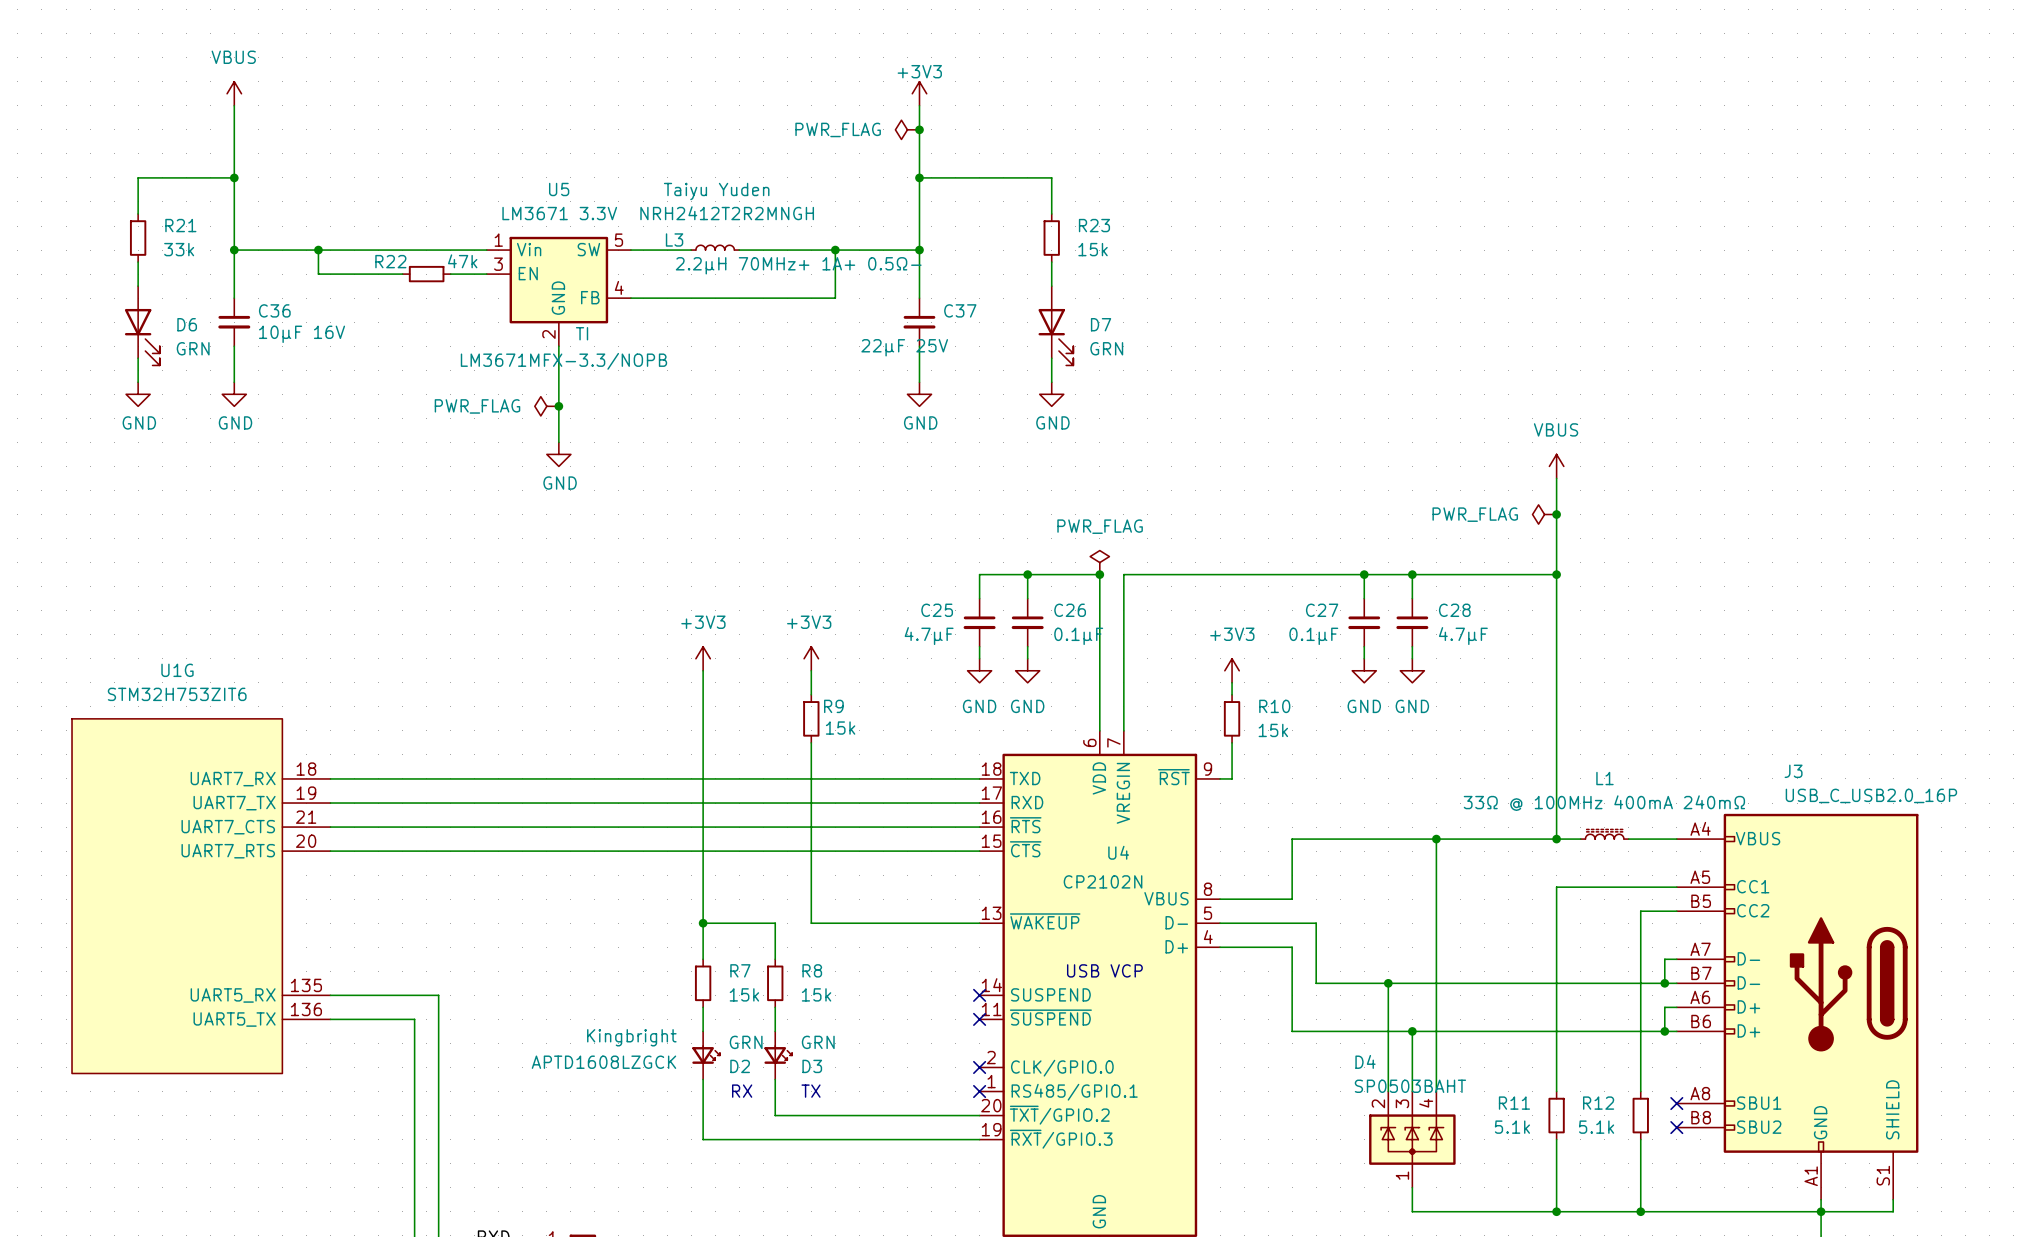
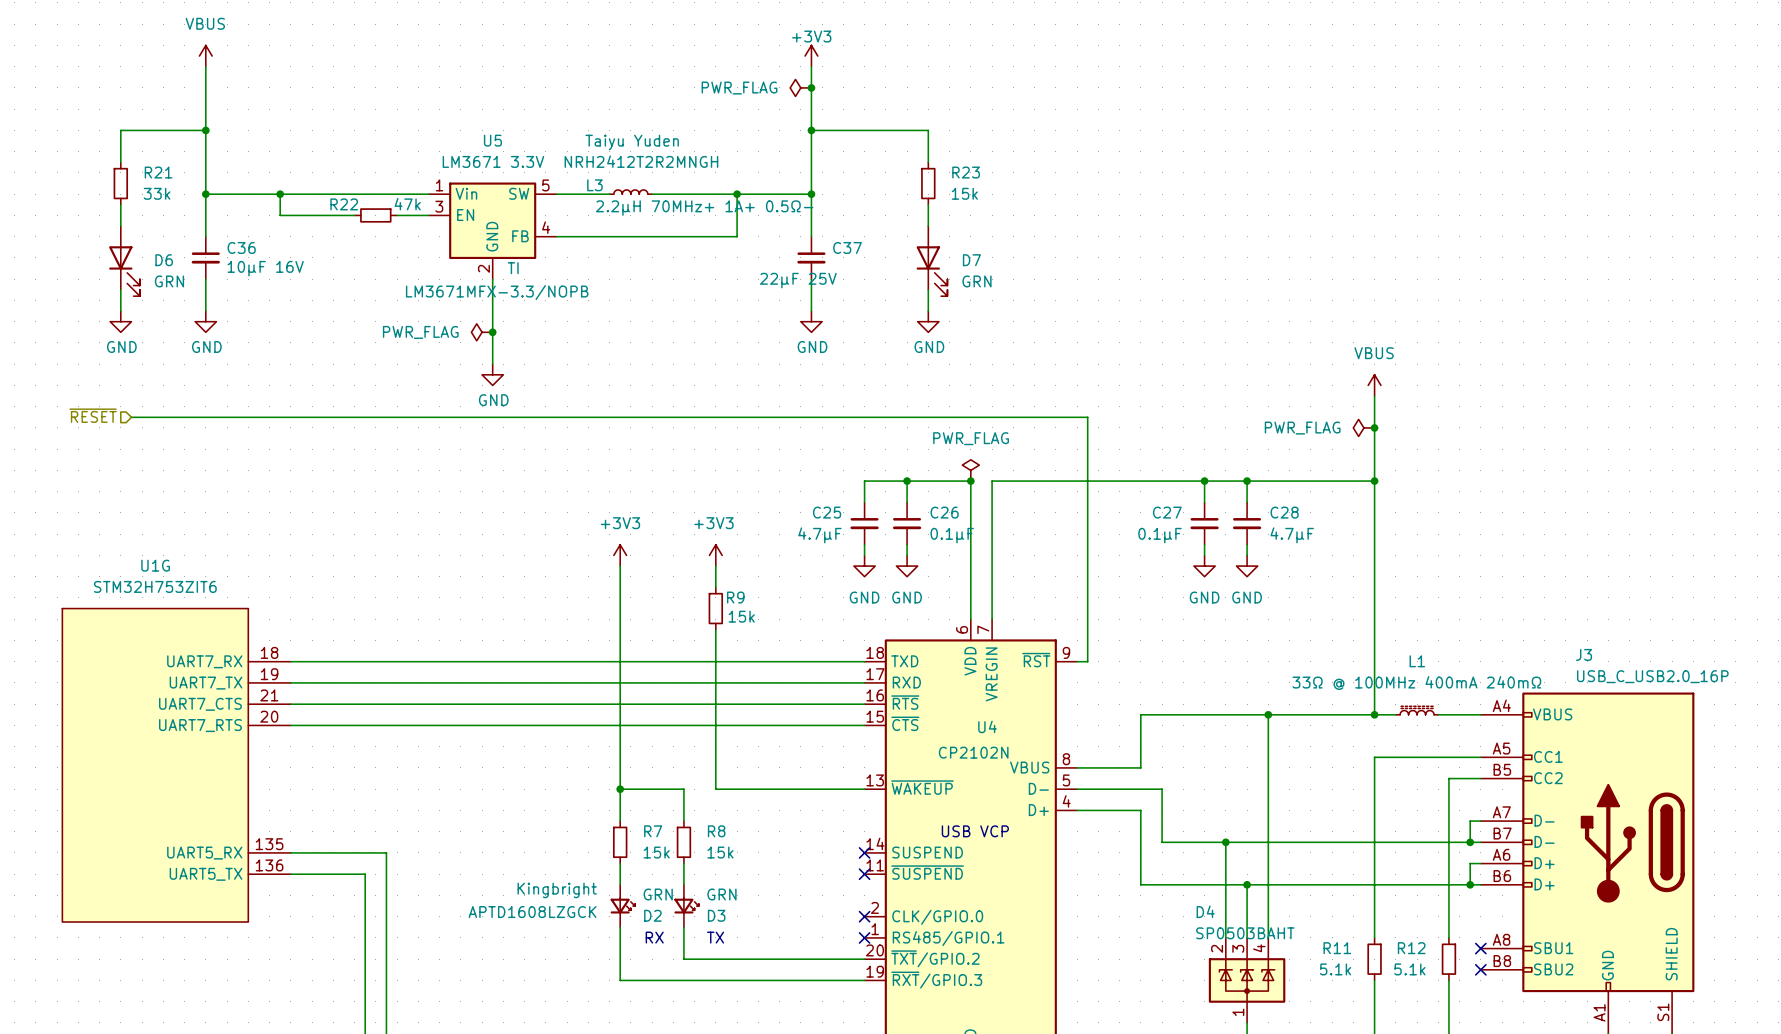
hierarchical label: none -> ~{RESET} (93, 415)
wire: none -> (131, 417) (1087, 417) (1087, 576)
power symbol: +3V3 (1232, 670) -> none
wire: none -> (1087, 587) (1087, 629)
R10: 15k (1232, 718) -> none

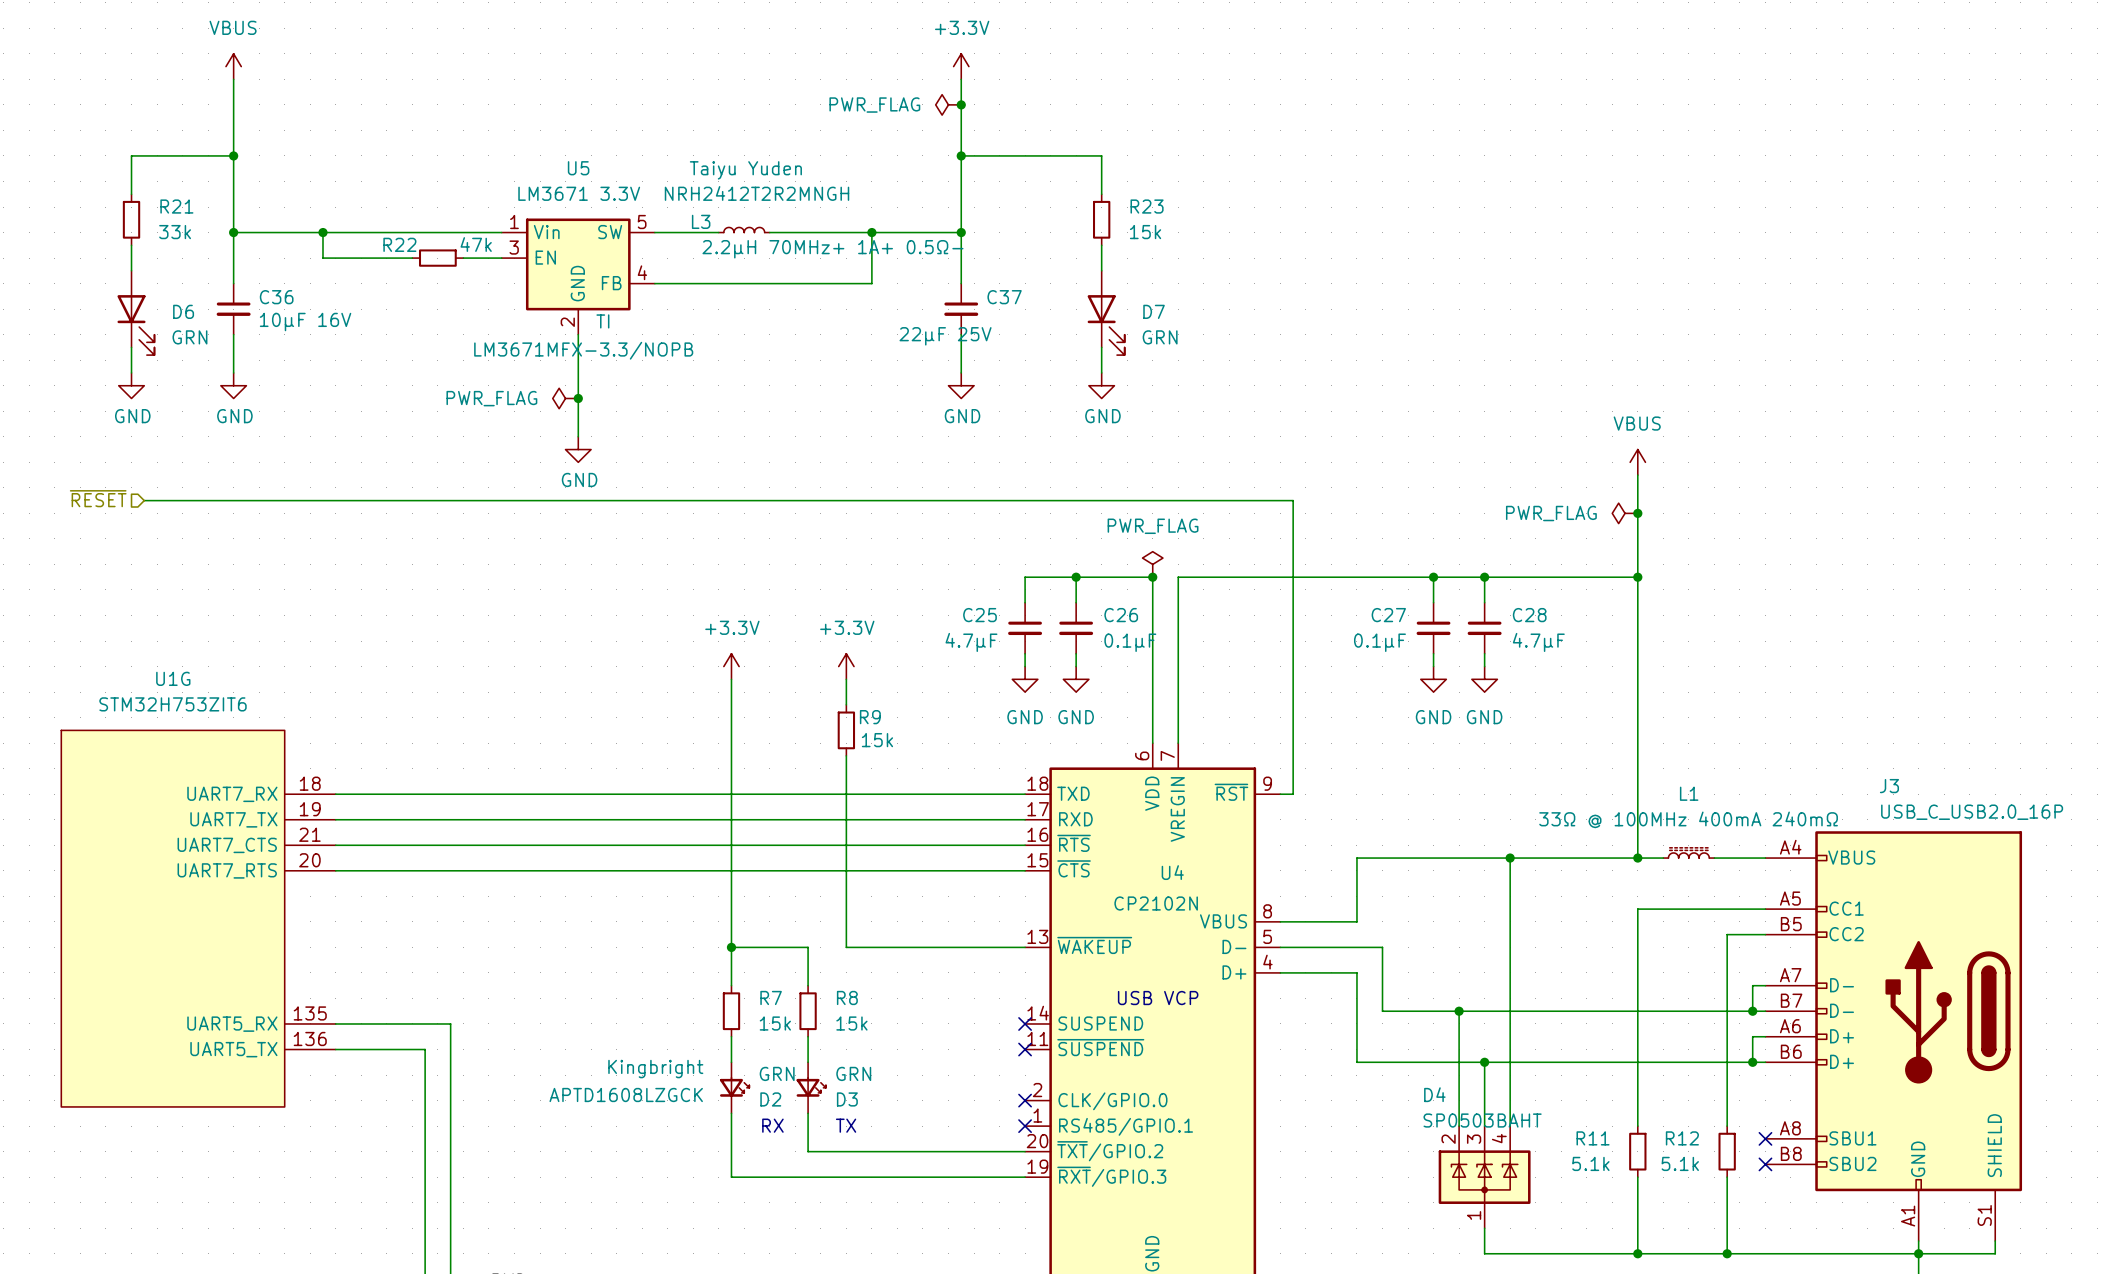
power symbol: +3V3 (811, 56) -> +3.3V (961, 66)
power symbol: +3V3 (620, 555) -> +3.3V (731, 666)
power symbol: +3V3 (715, 555) -> +3.3V (846, 666)

